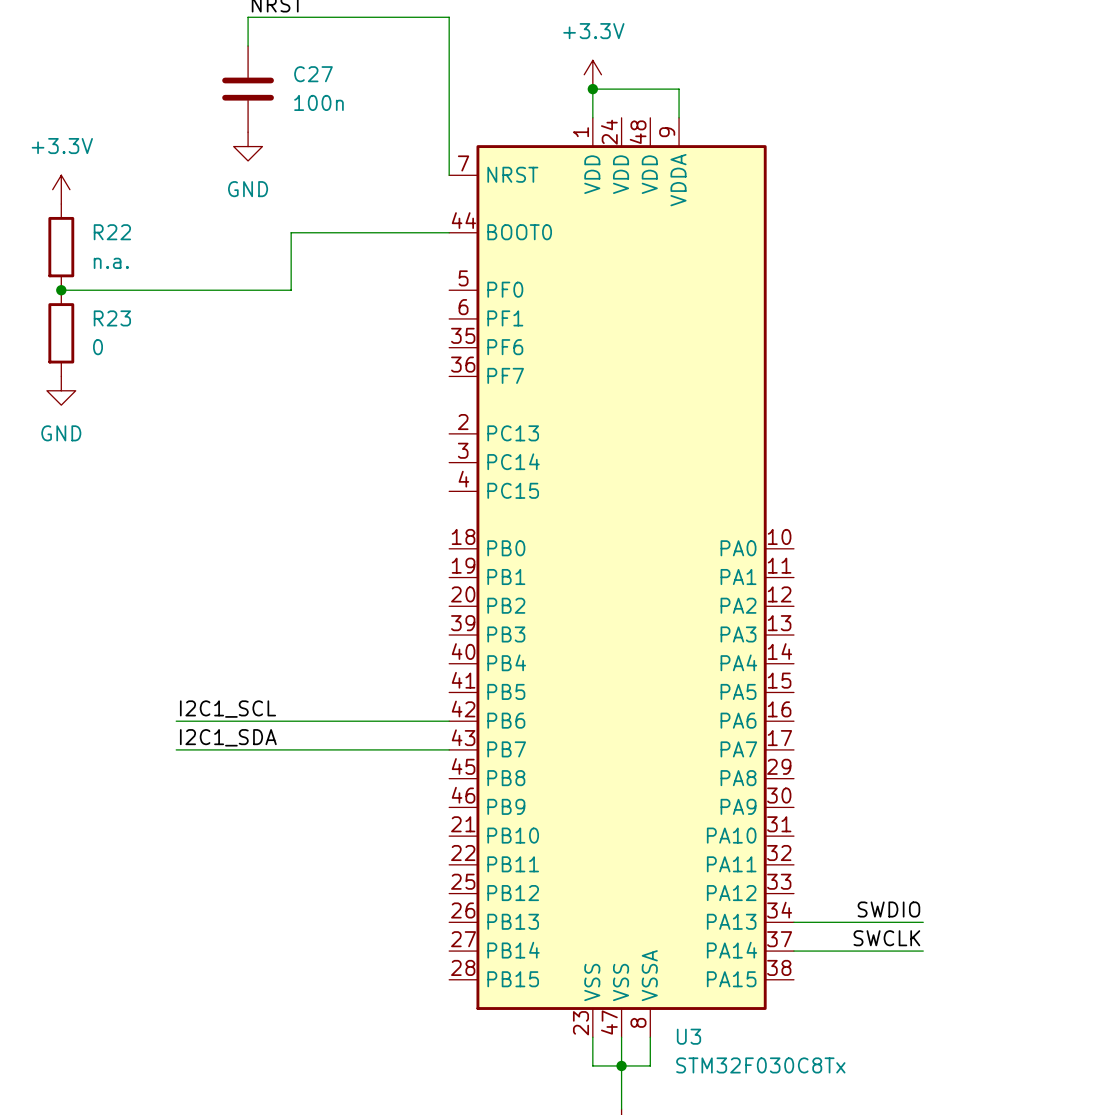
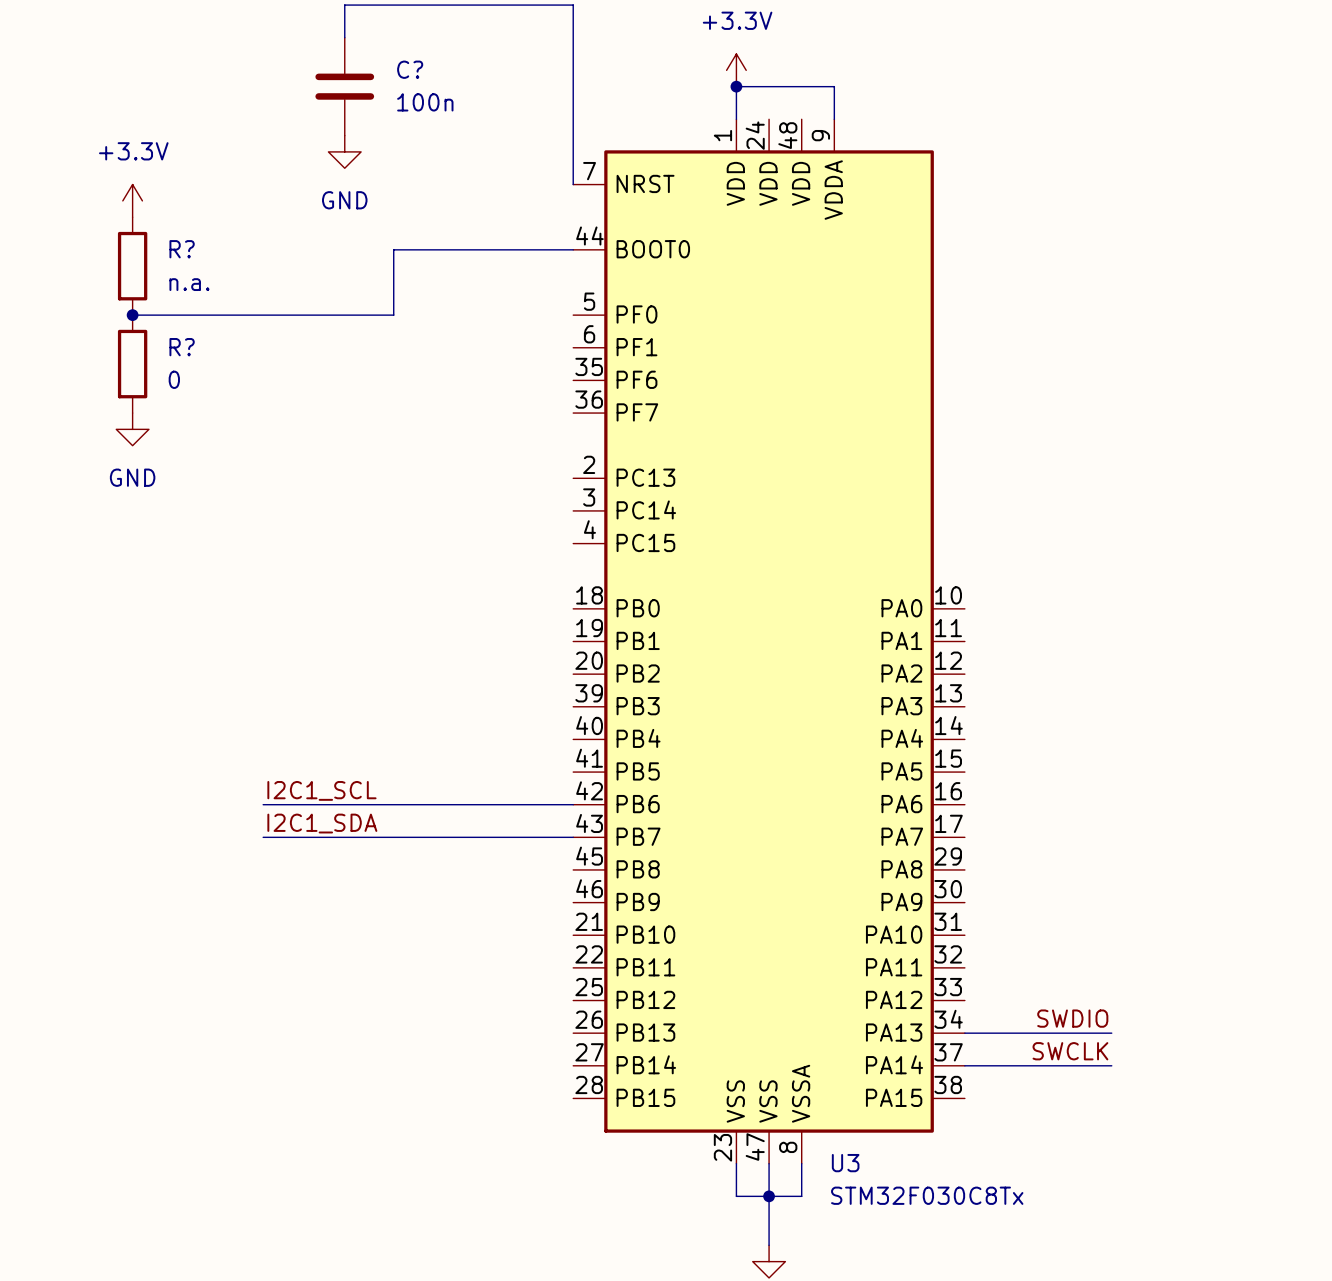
C27 name: C27 (313, 74) -> C? (410, 69)
R22 name: R22 (112, 232) -> R? (182, 249)
R23 name: R23 (112, 318) -> R? (182, 347)

